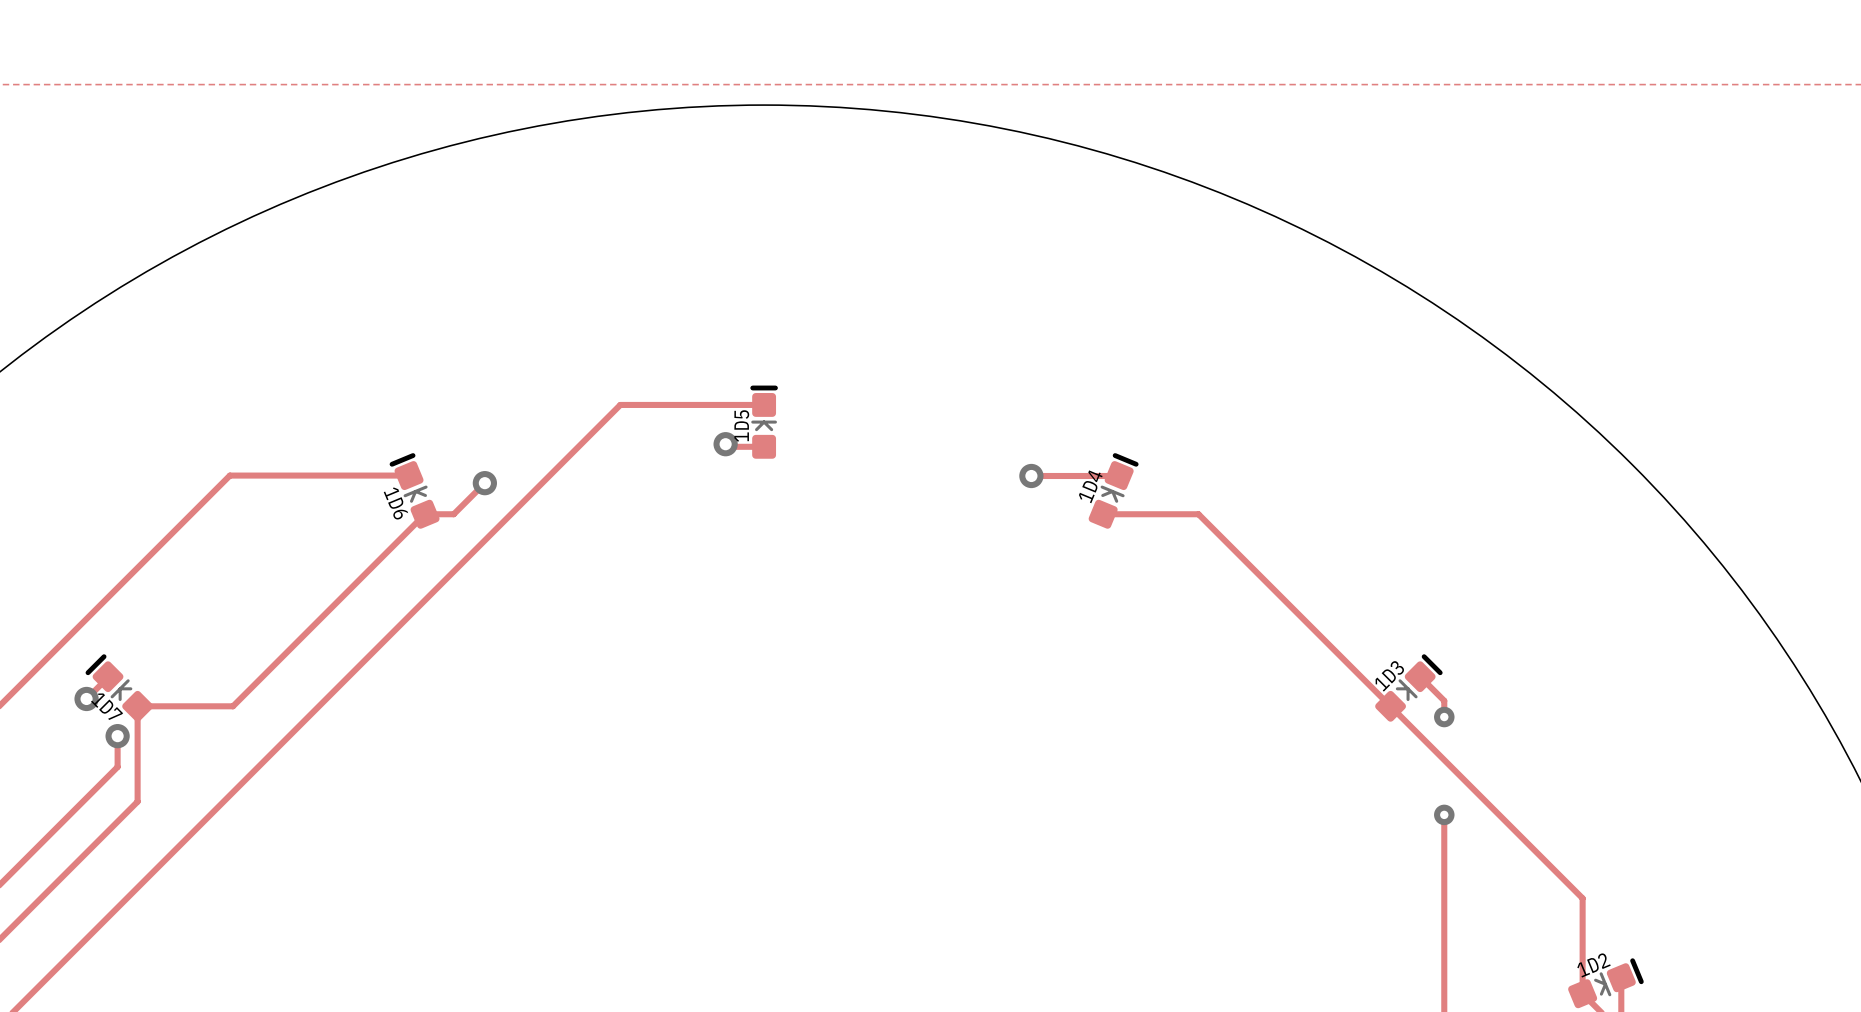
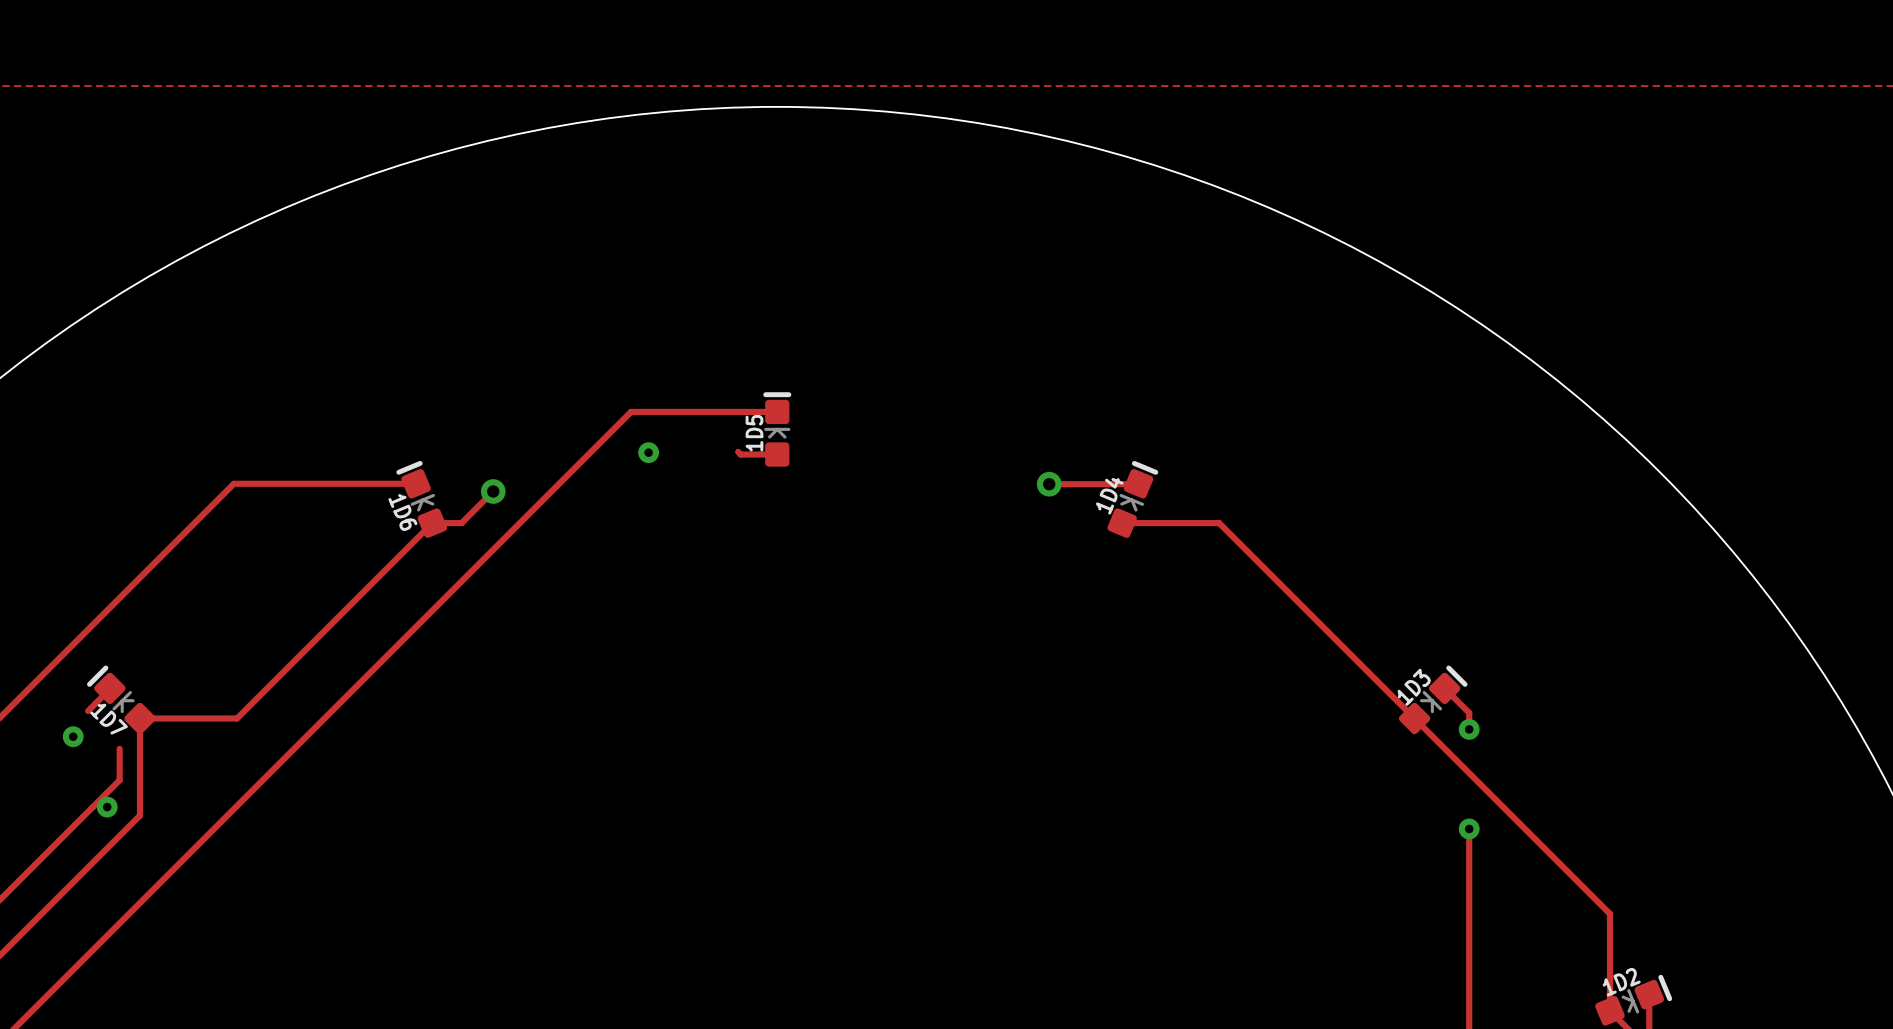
via: none -> (648, 452)
via: (725, 444) -> none
via: (86, 698) -> none
via: none -> (73, 736)
via: (117, 736) -> none
via: none -> (107, 807)

